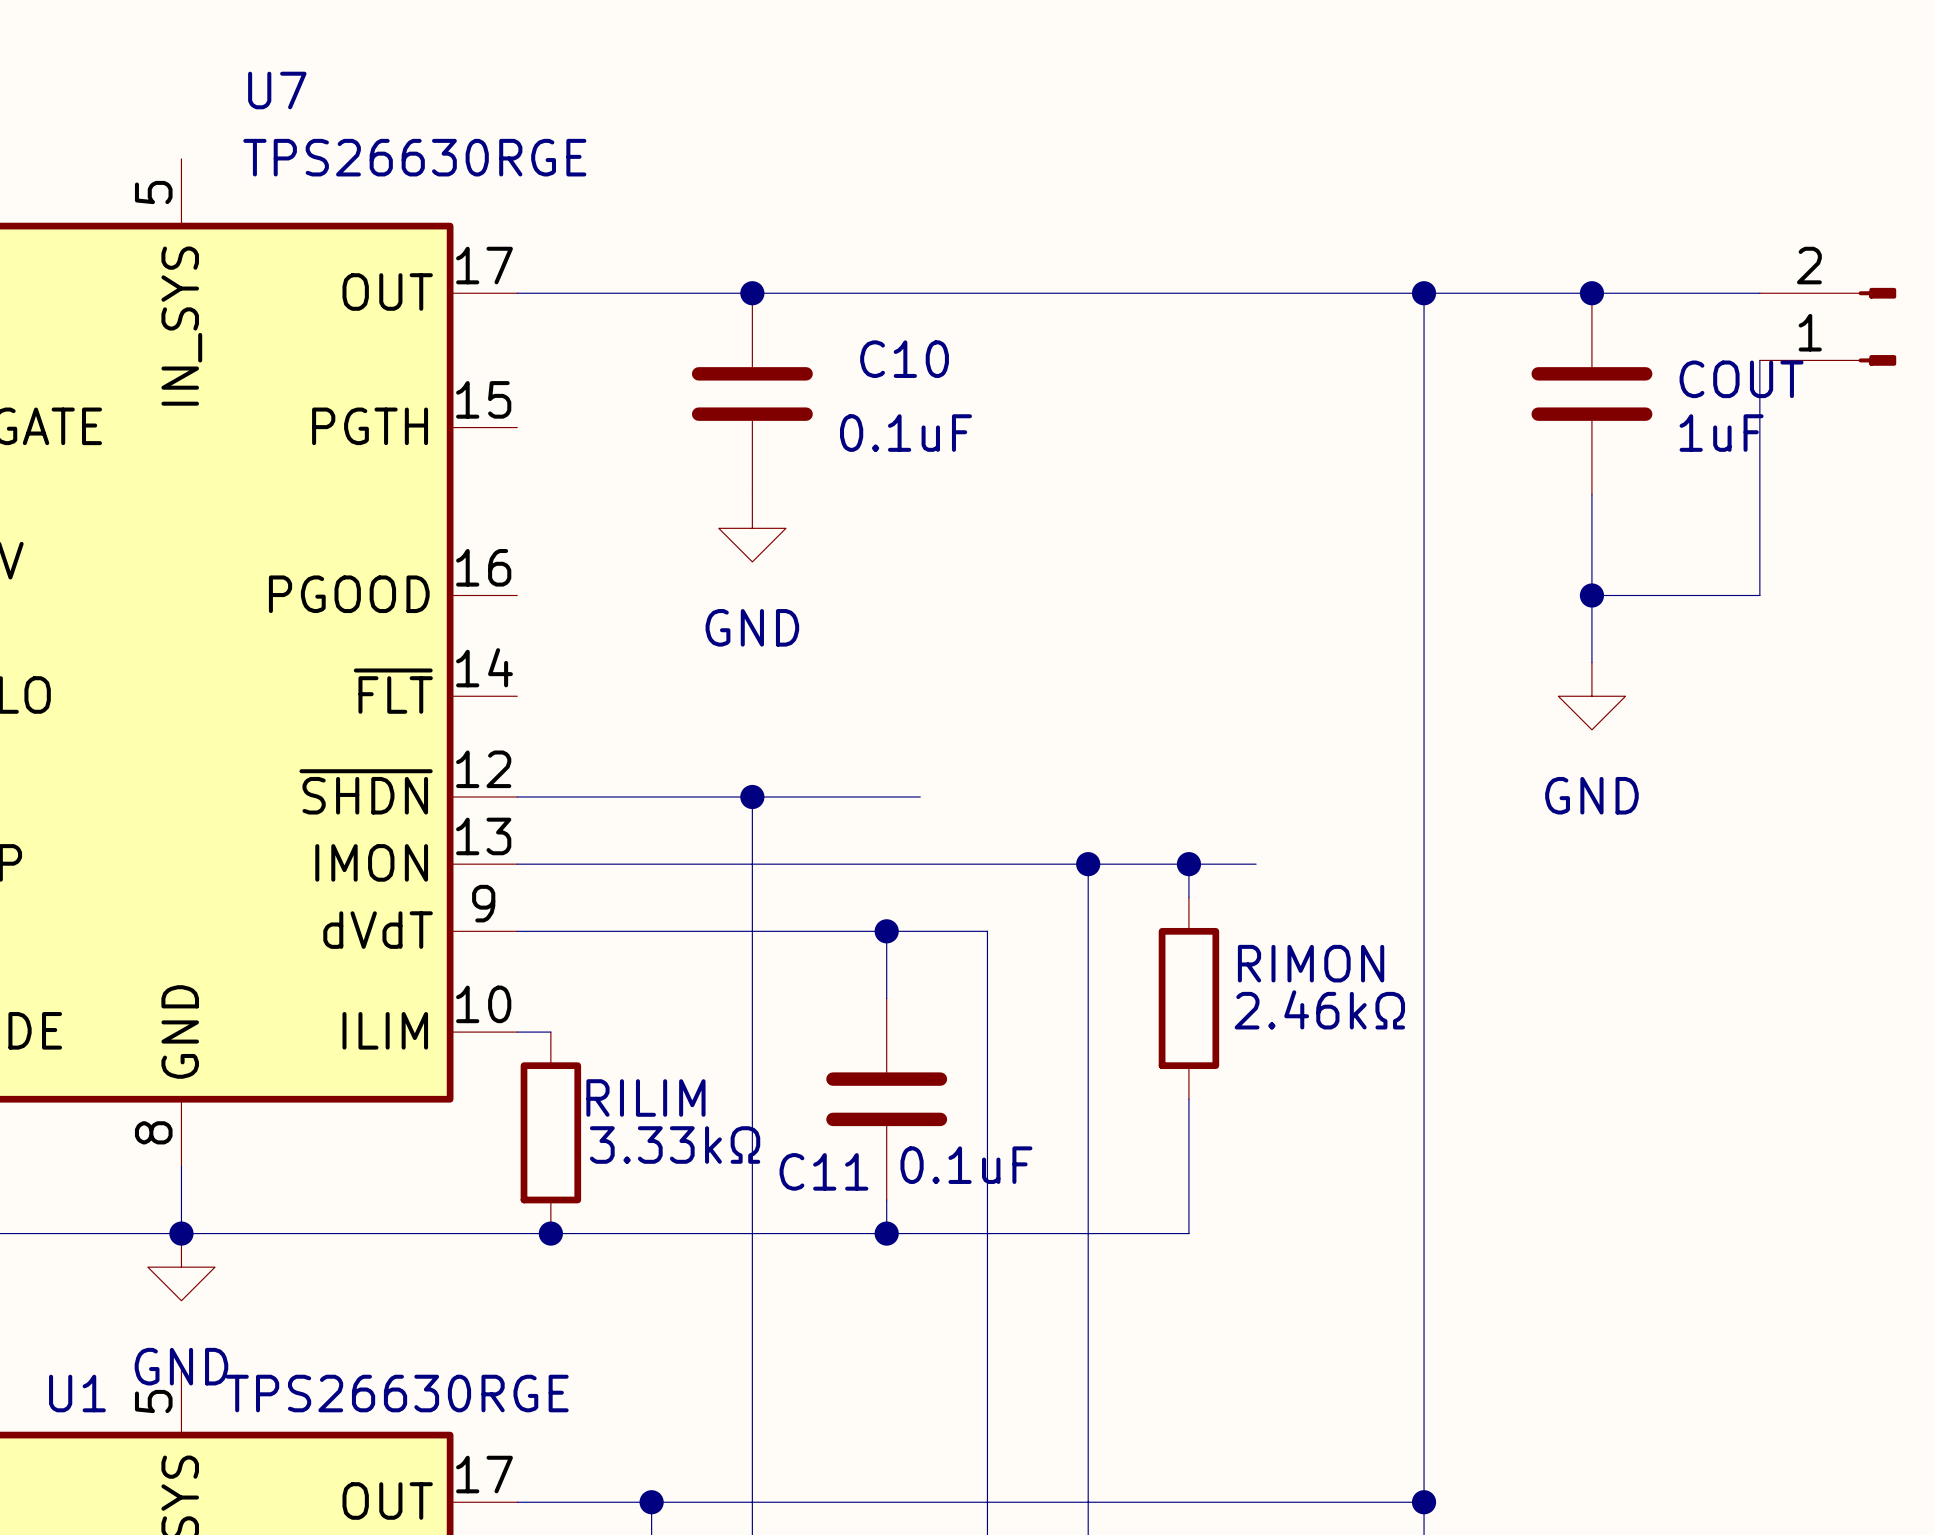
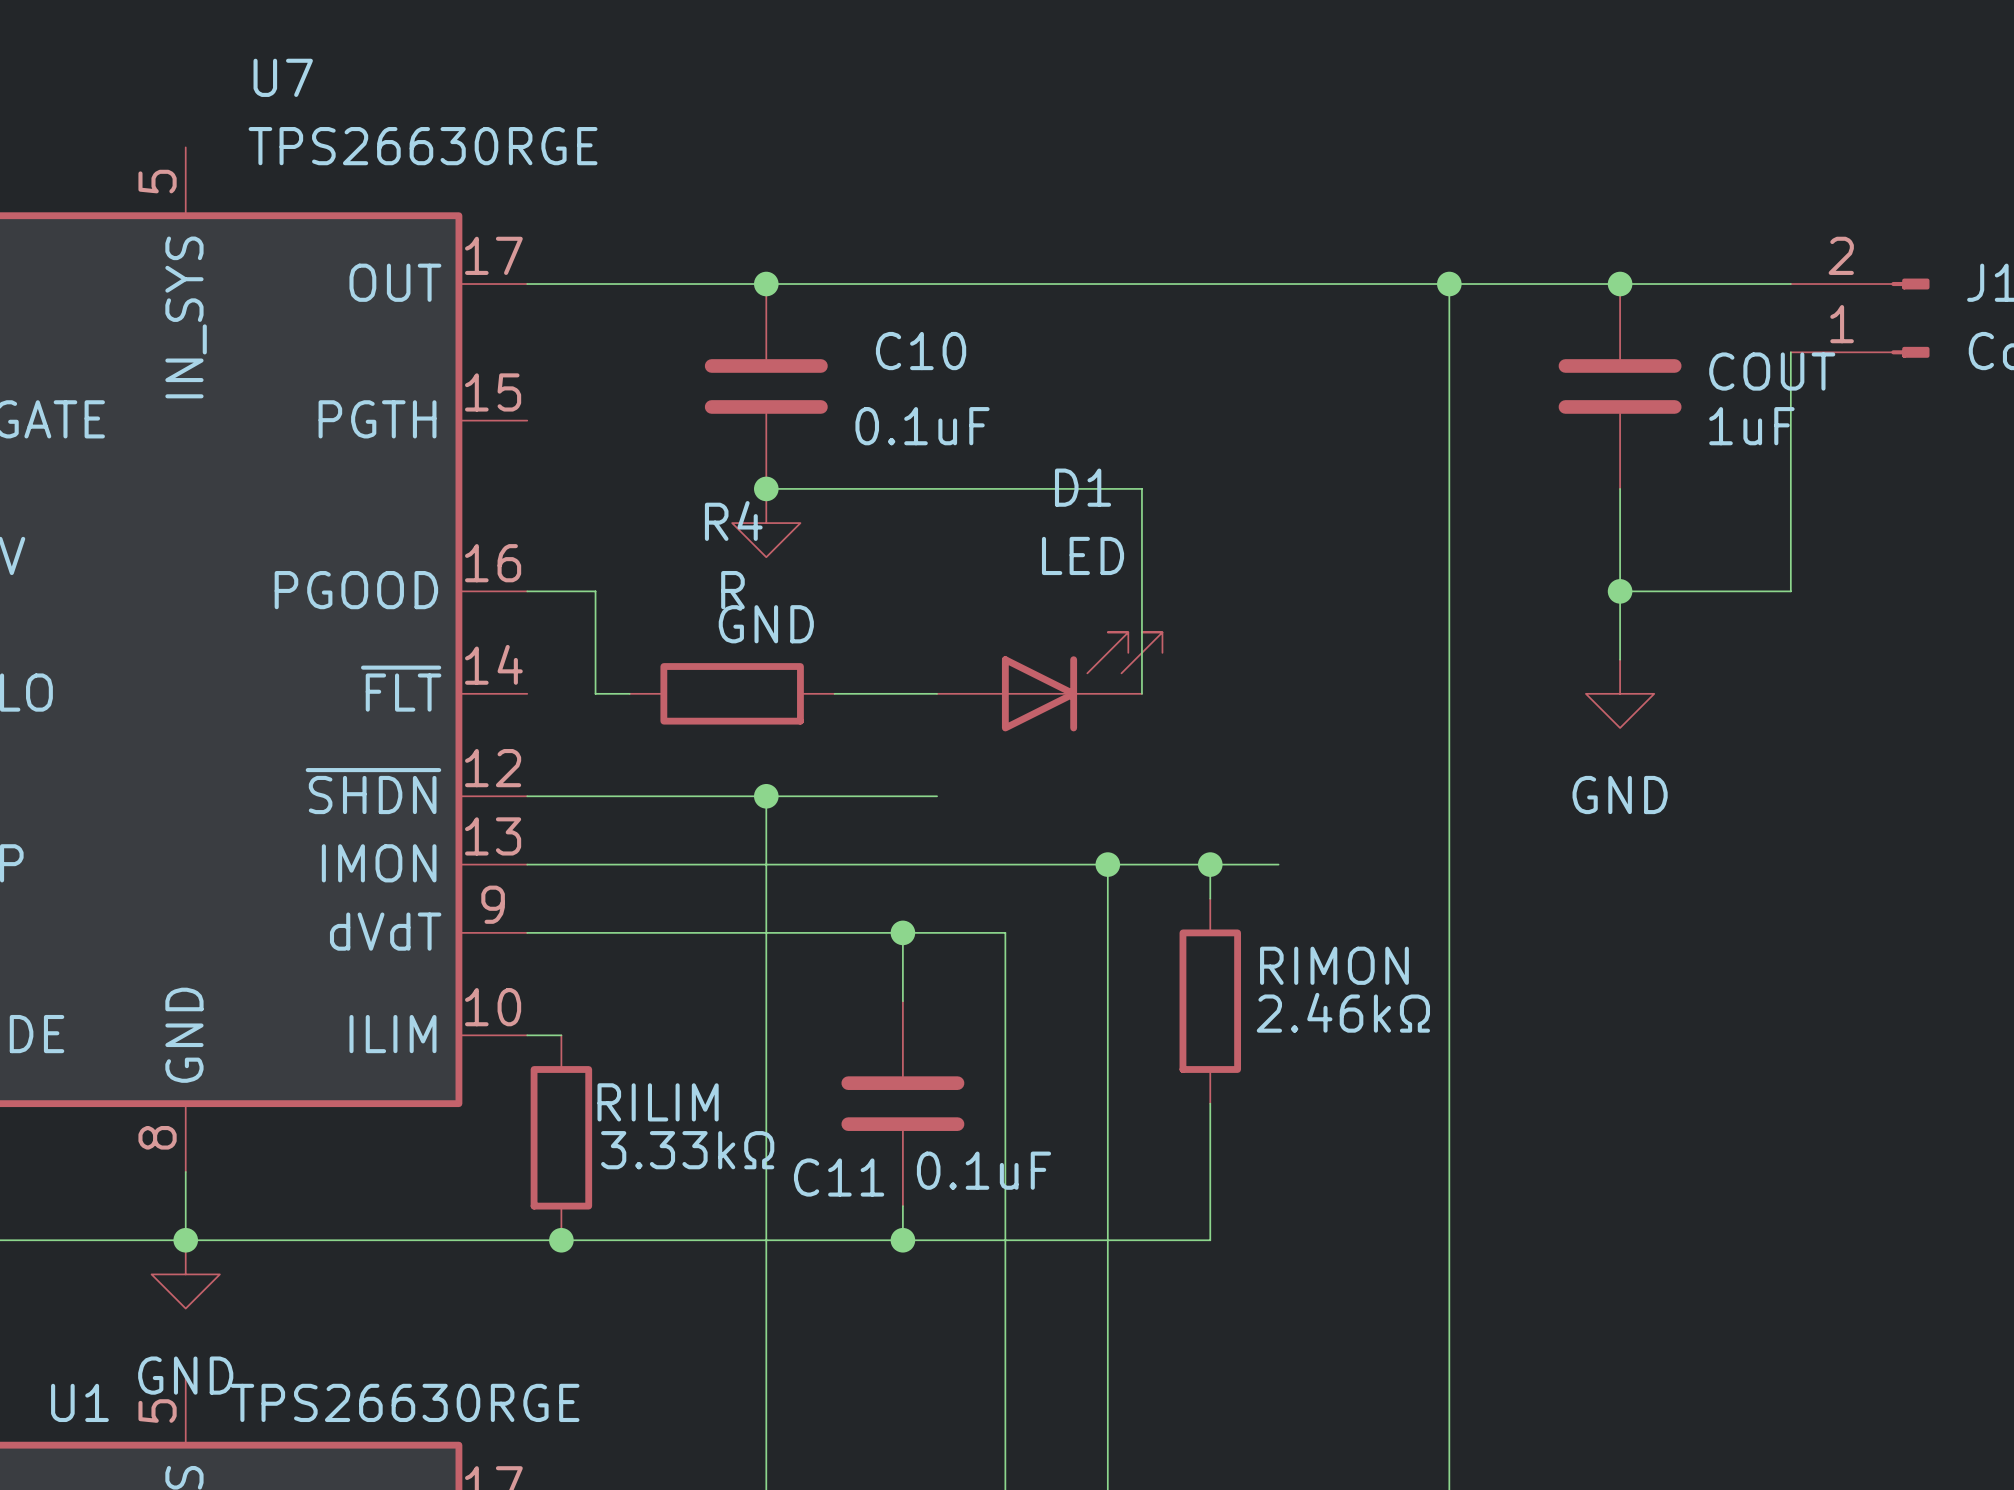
wire: none -> (766, 488) (1141, 488) (1141, 693)
junction: none -> (766, 488)
wire: none -> (527, 591) (595, 591) (595, 693) (629, 693)
D1: none -> LED (1049, 681)
R4: none -> R (732, 693)
wire: none -> (834, 693) (937, 693)

